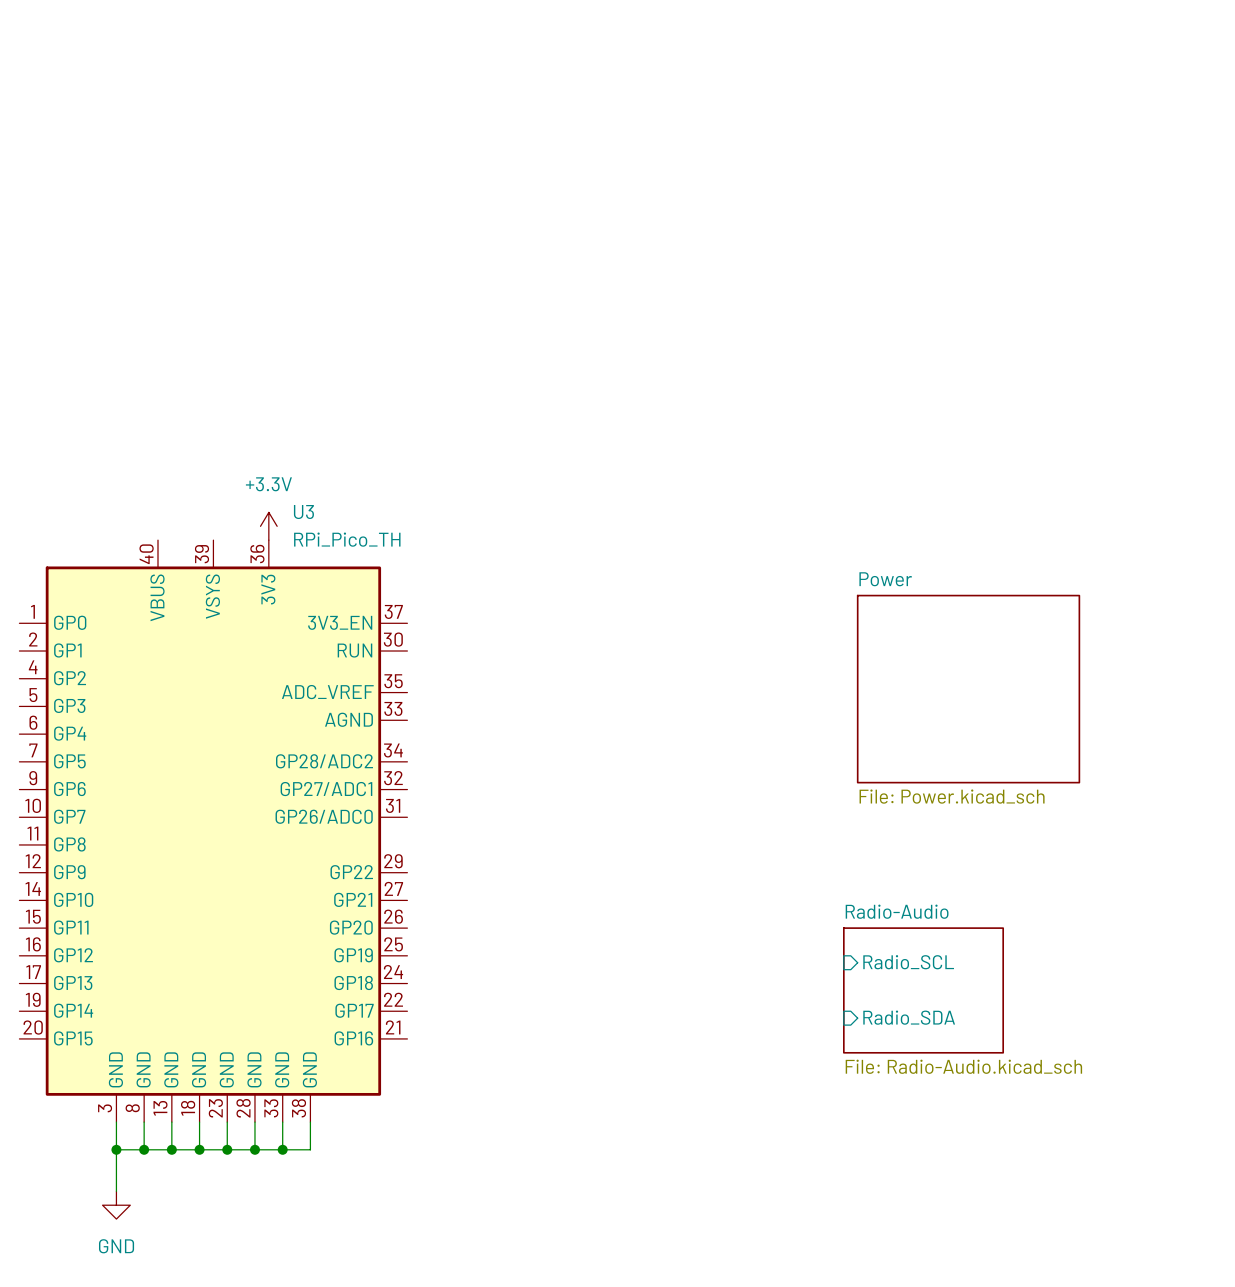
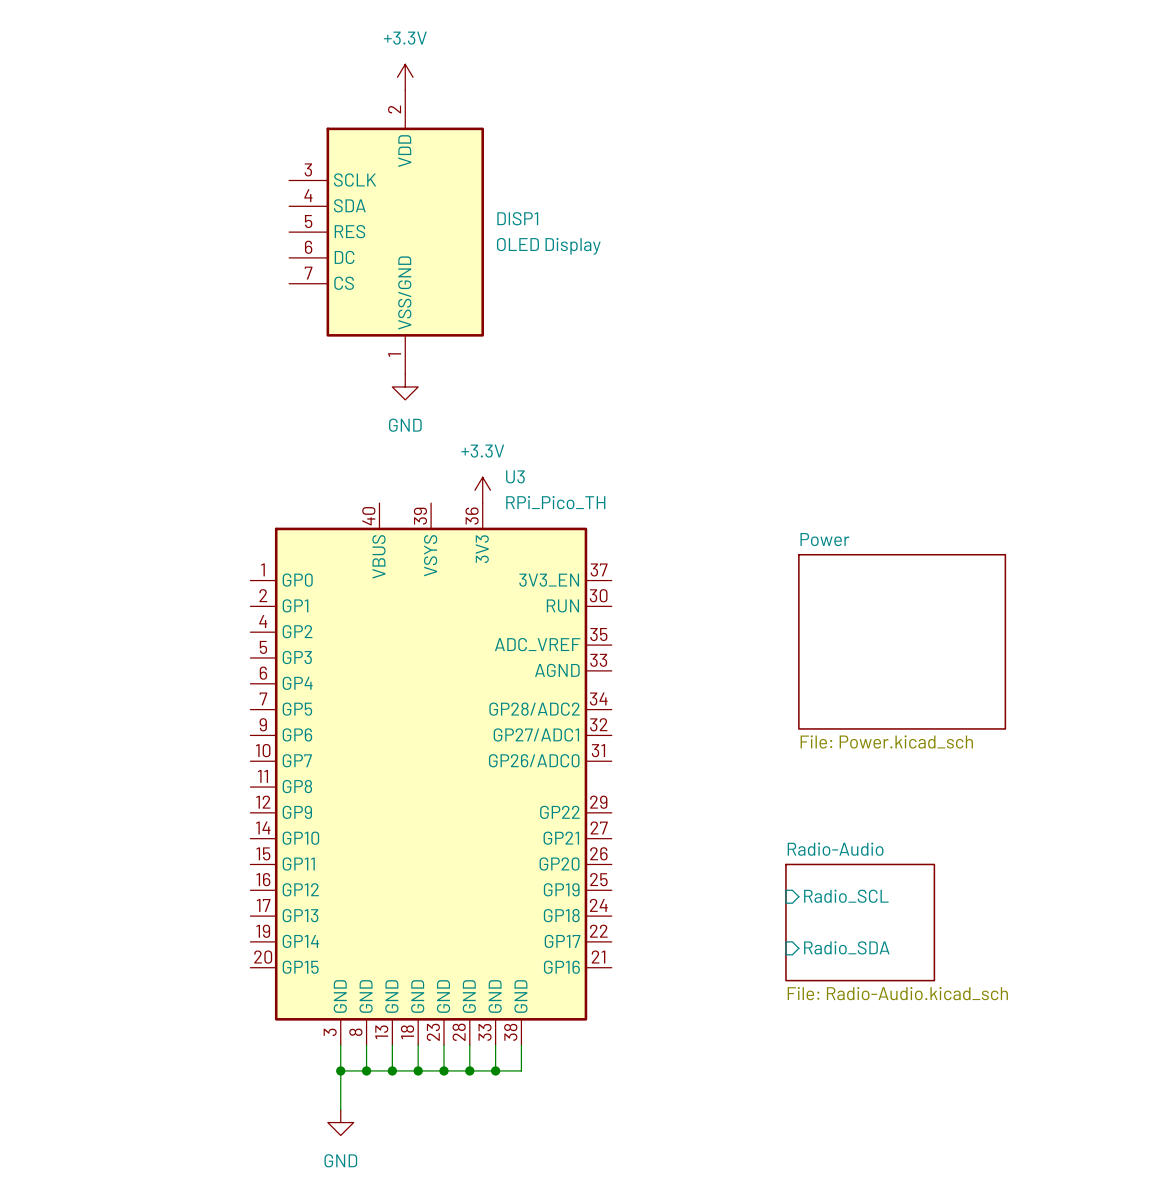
power symbol: none -> +3.3V (405, 77)
DISP1: none -> OLED Display (386, 232)
power symbol: none -> GND (405, 386)
power symbol: +3.3V (268, 526) -> none
power symbol: none -> +3.3V (482, 490)
U3 position: (213, 831) -> (431, 774)
wire: (116, 1122) (116, 1191) -> (340, 1045) (340, 1109)
wire: (144, 1122) (144, 1149) -> (366, 1045) (366, 1070)
wire: (171, 1122) (171, 1149) -> (392, 1045) (392, 1070)
wire: (199, 1122) (199, 1149) -> (418, 1045) (418, 1070)
wire: (227, 1122) (227, 1149) -> (443, 1045) (443, 1070)
wire: (254, 1122) (254, 1149) -> (469, 1045) (469, 1070)
wire: (282, 1122) (282, 1149) -> (495, 1045) (495, 1070)
wire: (310, 1122) (310, 1149) (116, 1149) -> (521, 1045) (521, 1070) (340, 1070)
junction: (116, 1149) -> none
junction: (144, 1149) -> none
junction: (171, 1149) -> none
junction: (199, 1149) -> none
junction: (227, 1149) -> none
junction: (254, 1149) -> none
junction: (282, 1149) -> none
junction: none -> (340, 1070)
junction: none -> (366, 1070)
junction: none -> (392, 1070)
junction: none -> (418, 1070)
junction: none -> (443, 1070)
junction: none -> (469, 1070)
junction: none -> (495, 1070)
power symbol position: GND (116, 1205) -> GND (340, 1122)

